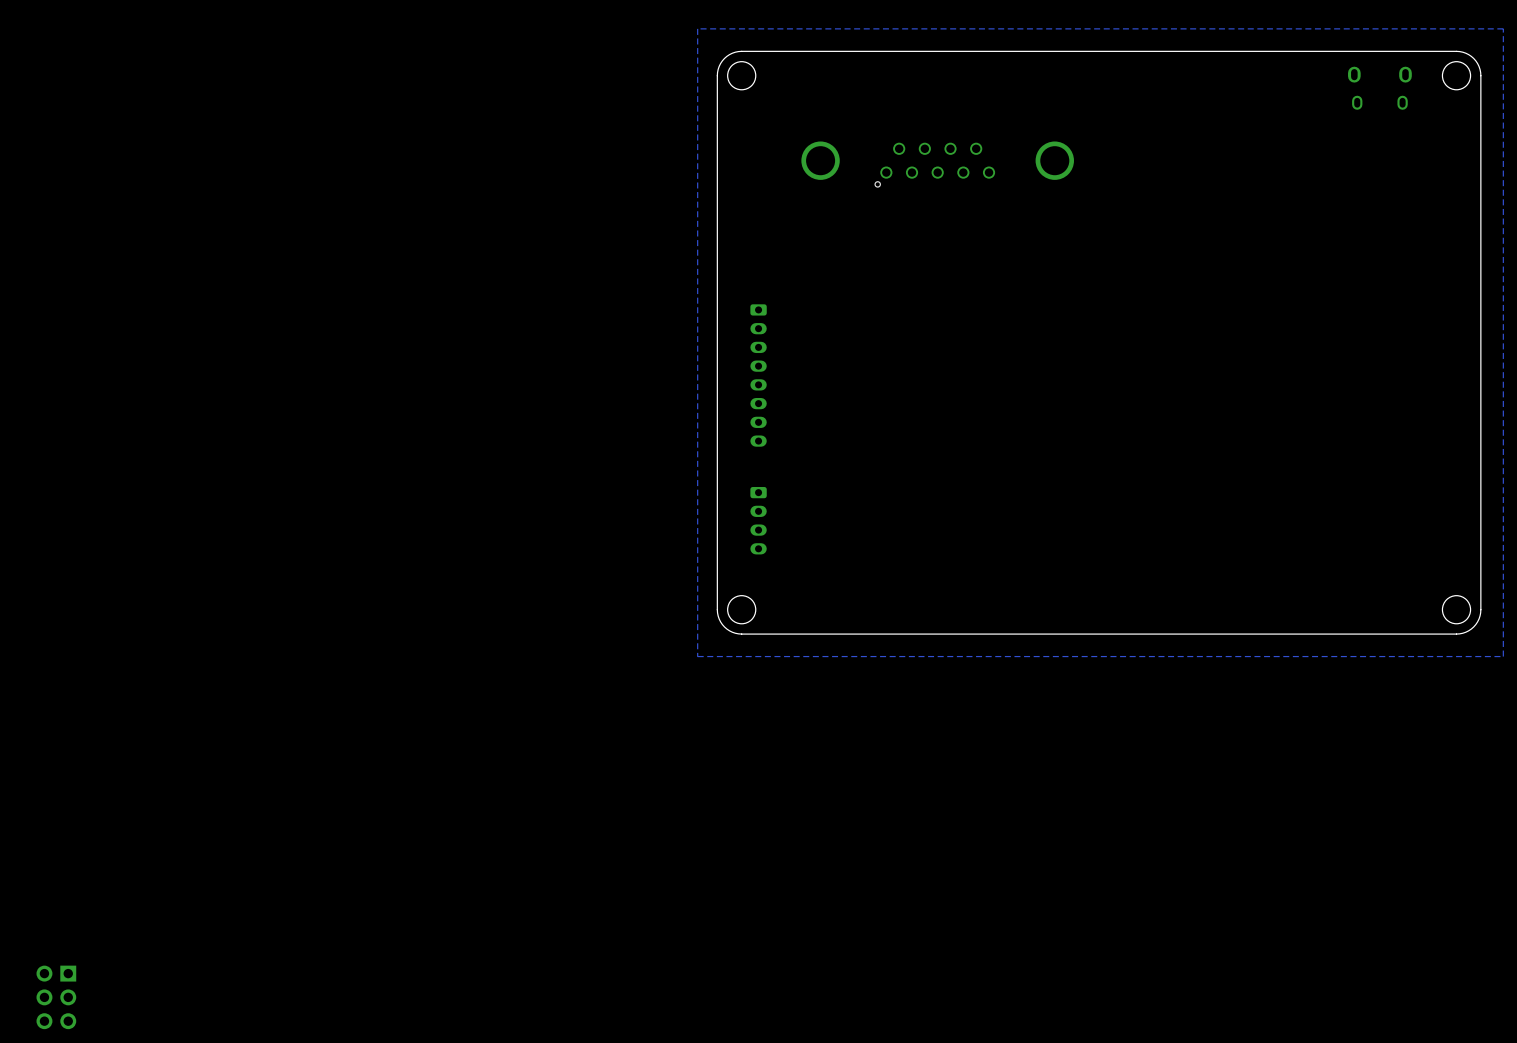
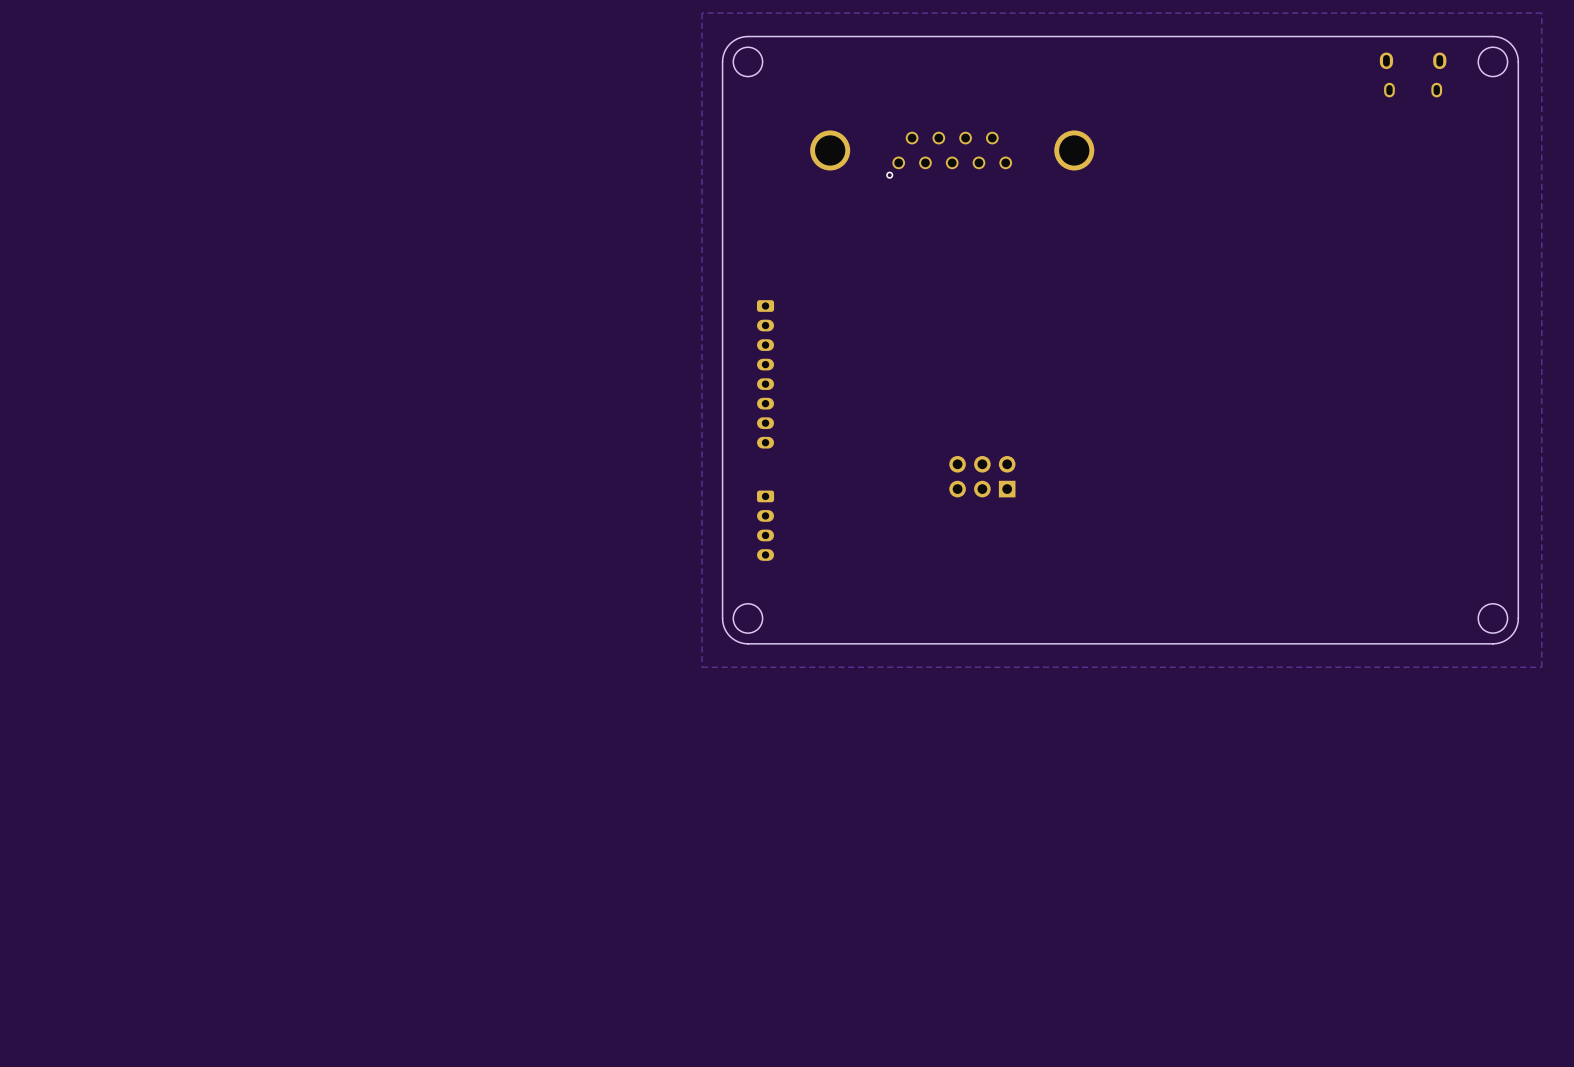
part: none -> (982, 476)
part: (56, 997) -> none

